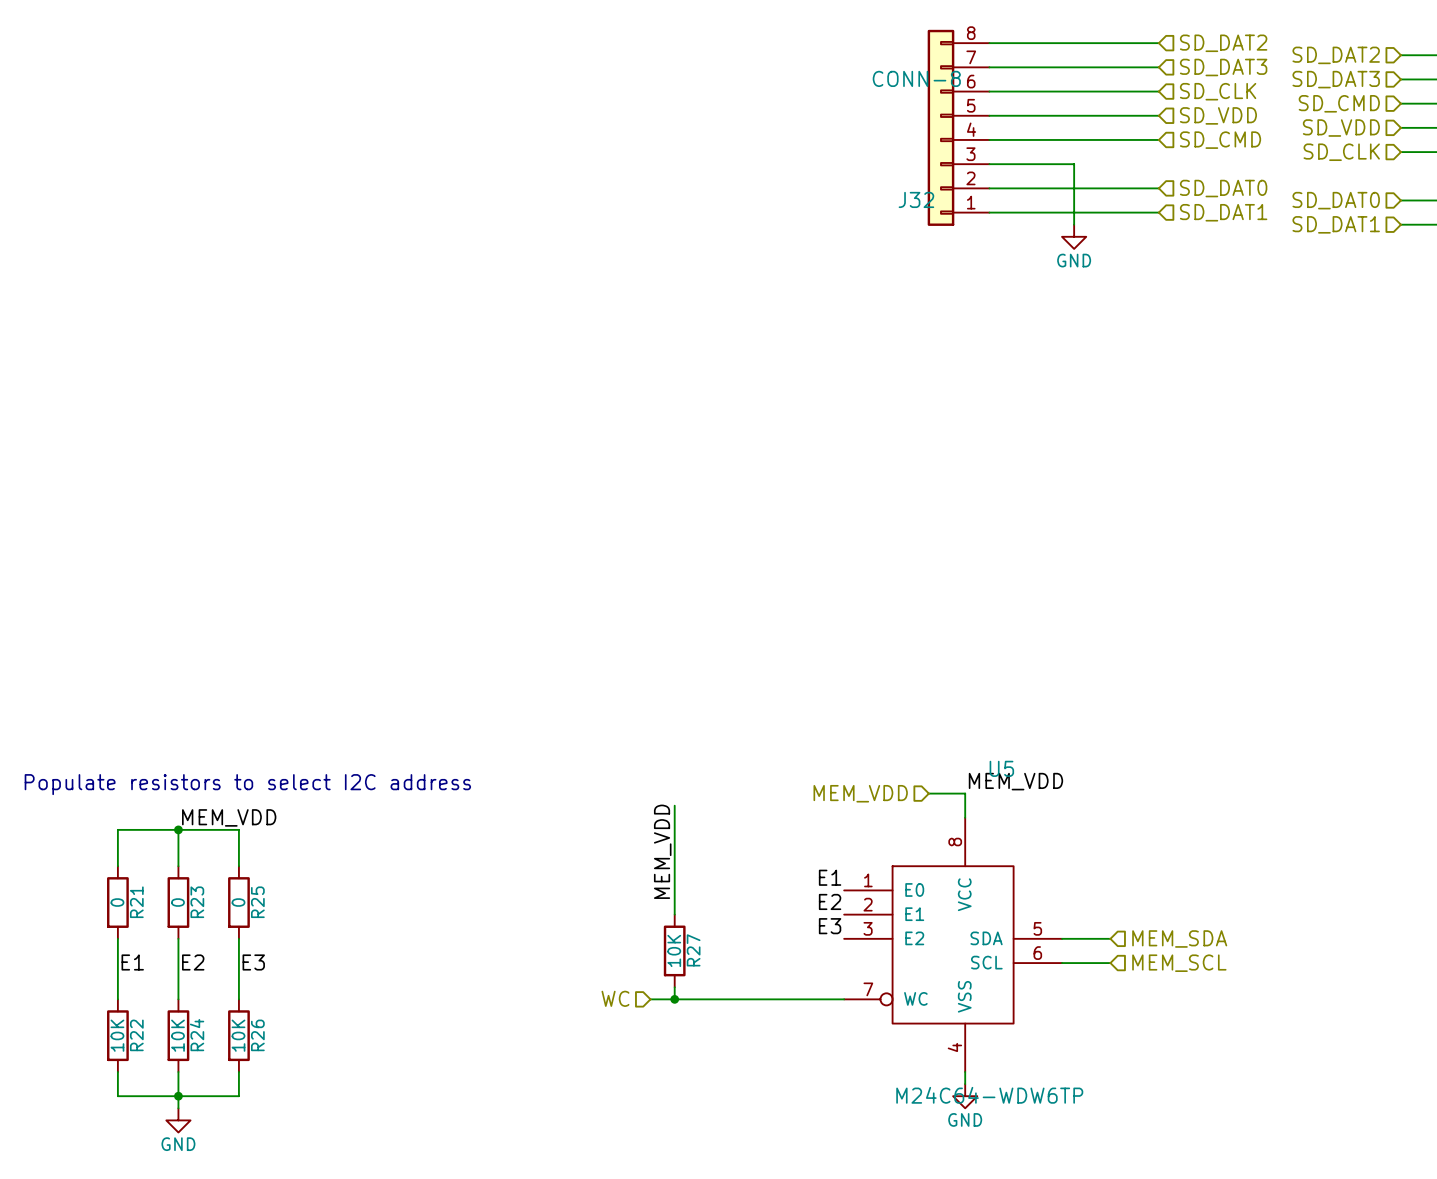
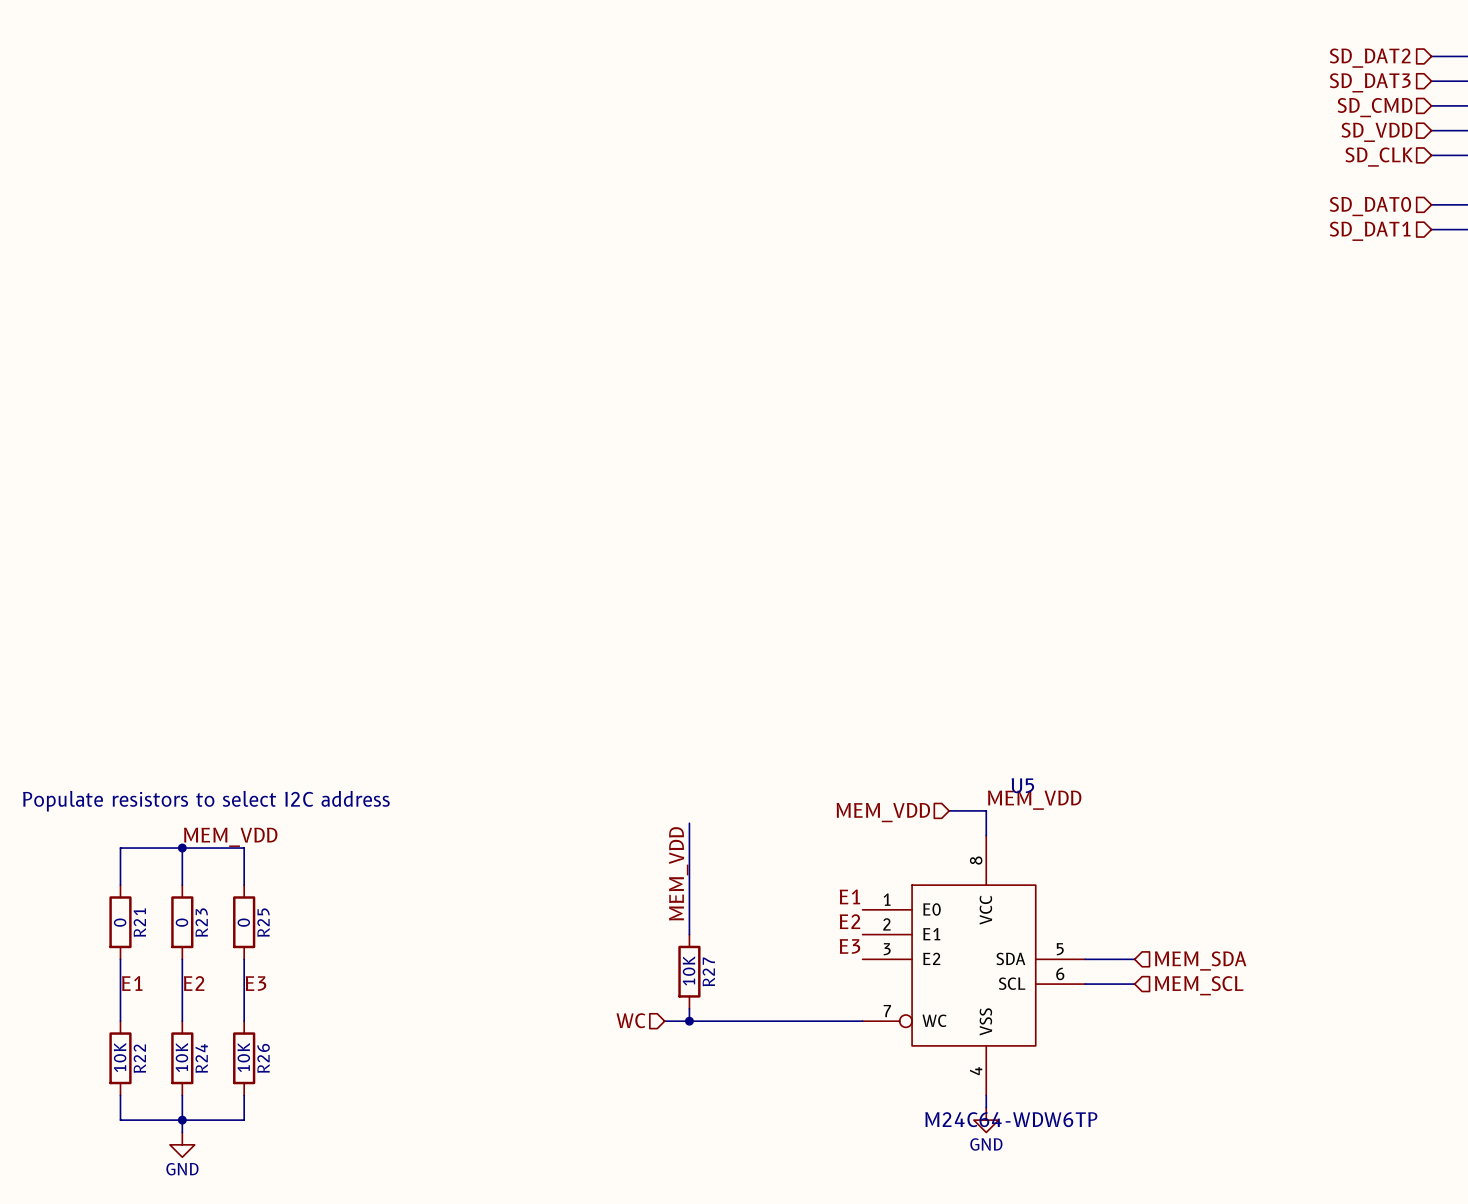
wire: (989, 43) (1158, 43) -> none
hierarchical label: SD_DAT2 (1223, 43) -> none
wire: (989, 67) (1158, 67) -> none
hierarchical label: SD_DAT3 (1223, 67) -> none
wire: (989, 91) (1158, 91) -> none
hierarchical label: SD_CLK (1218, 91) -> none
wire: (989, 115) (1158, 115) -> none
hierarchical label: SD_VDD (1218, 115) -> none
J32: CONN-8 (958, 127) -> none
wire: (989, 139) (1158, 139) -> none
hierarchical label: SD_CMD (1220, 140) -> none
wire: (989, 164) (1074, 164) (1074, 224) -> none
wire: (989, 188) (1158, 188) -> none
hierarchical label: SD_DAT0 (1223, 188) -> none
wire: (989, 212) (1158, 212) -> none
hierarchical label: SD_DAT1 (1223, 212) -> none
power symbol: GND (1074, 236) -> none

